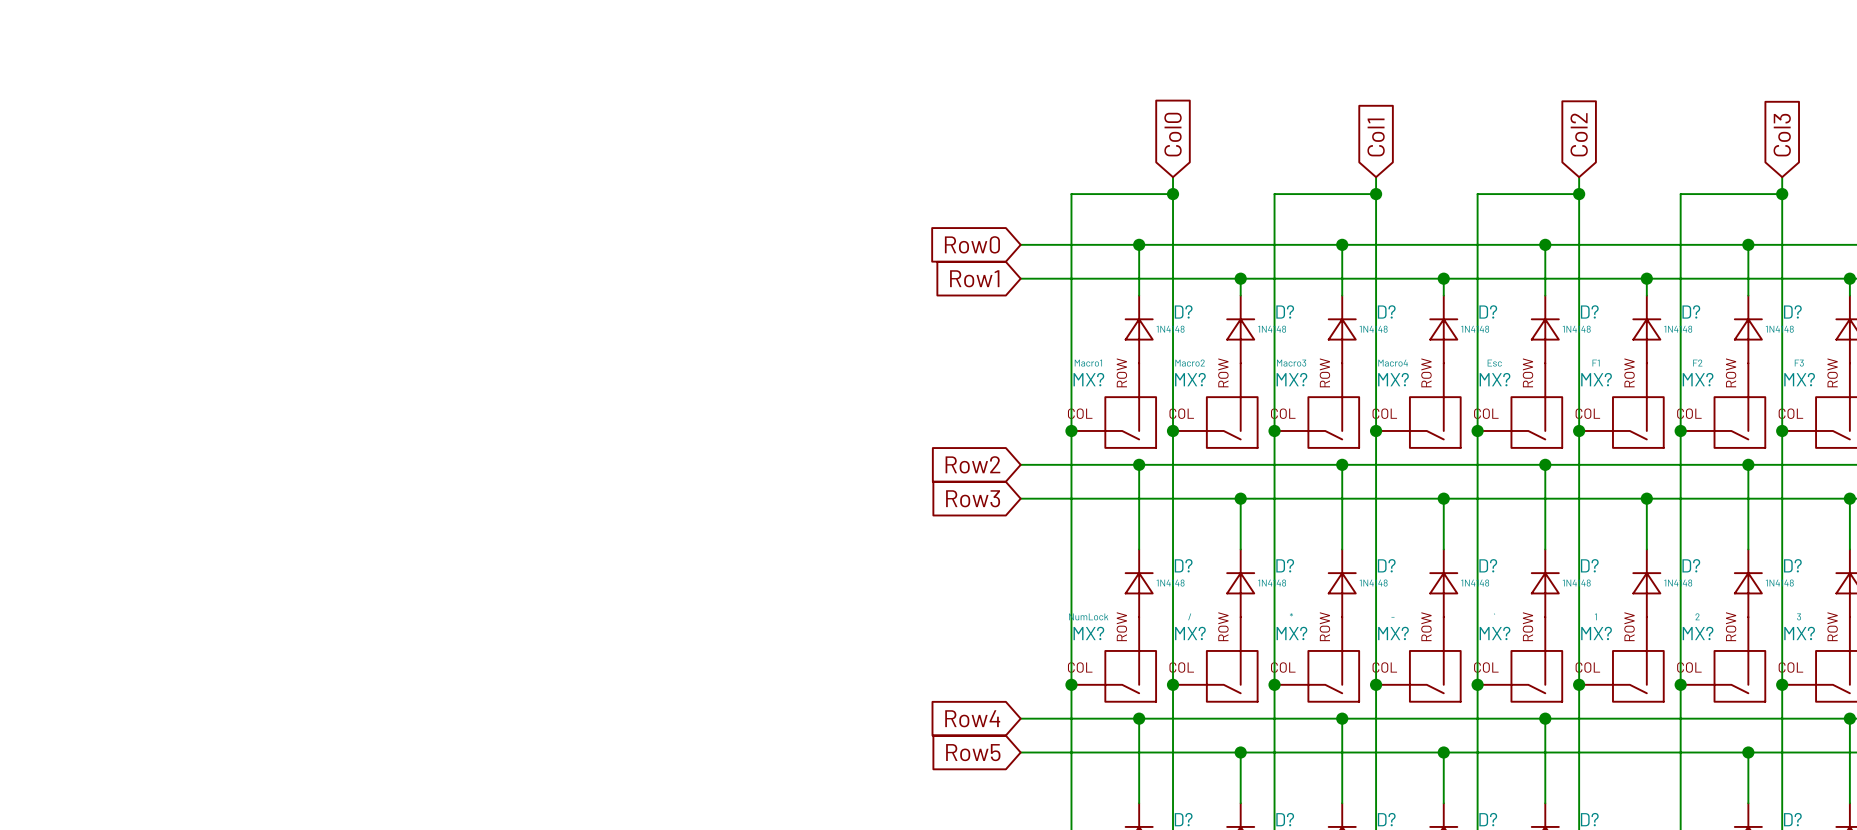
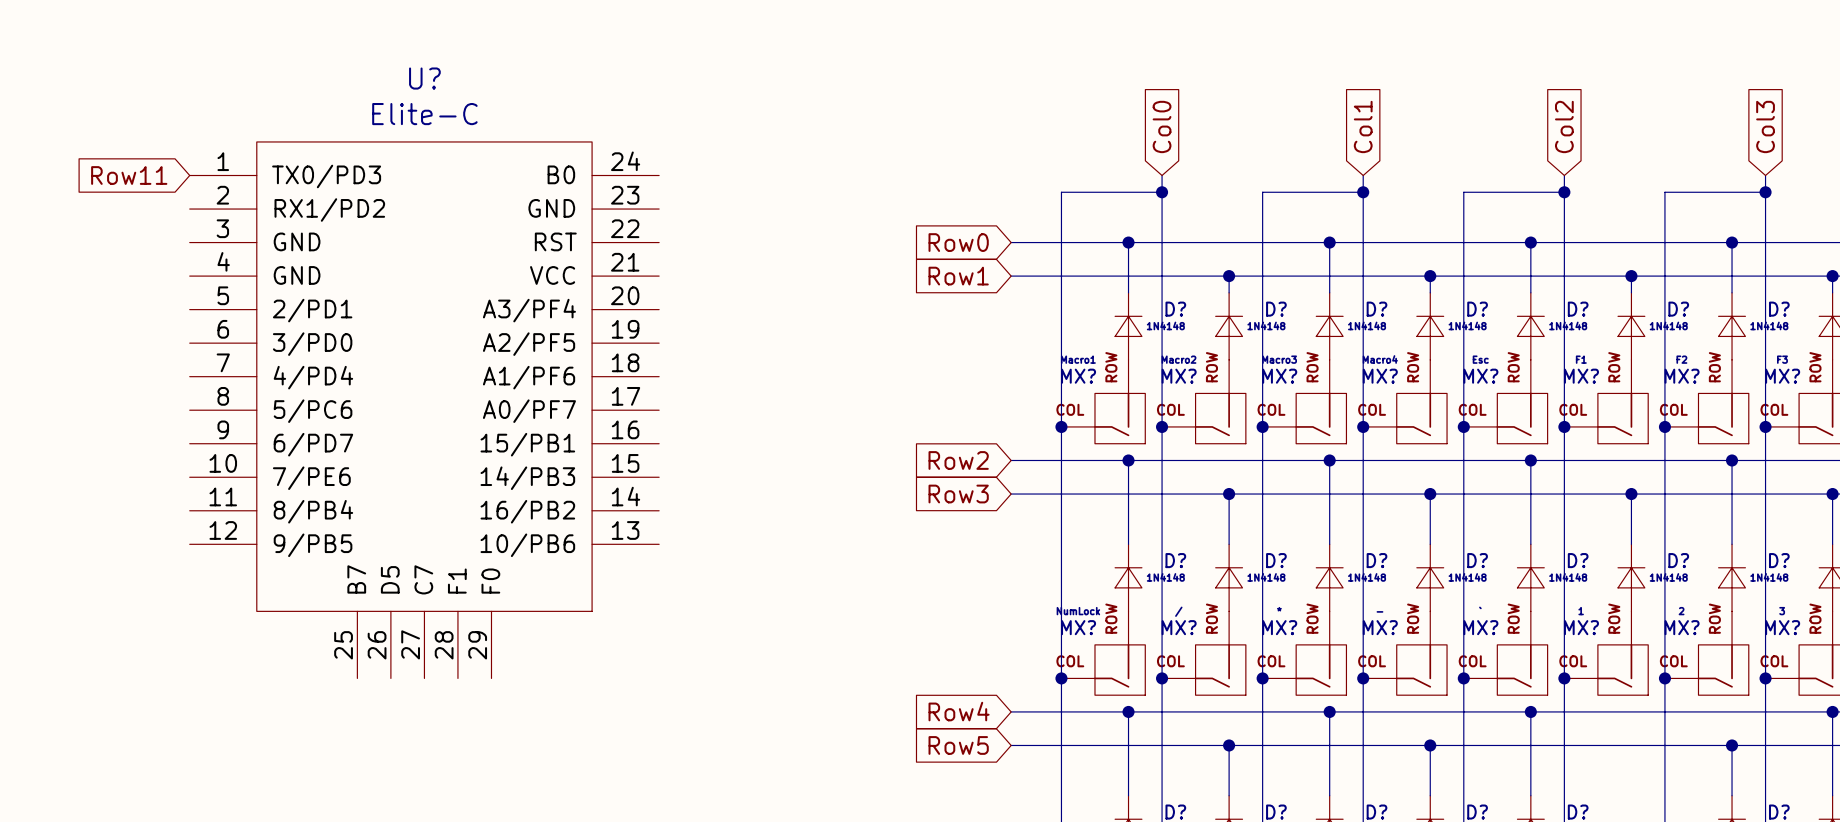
global label: none -> Row11 (129, 175)
U?: none -> Elite-C (424, 410)

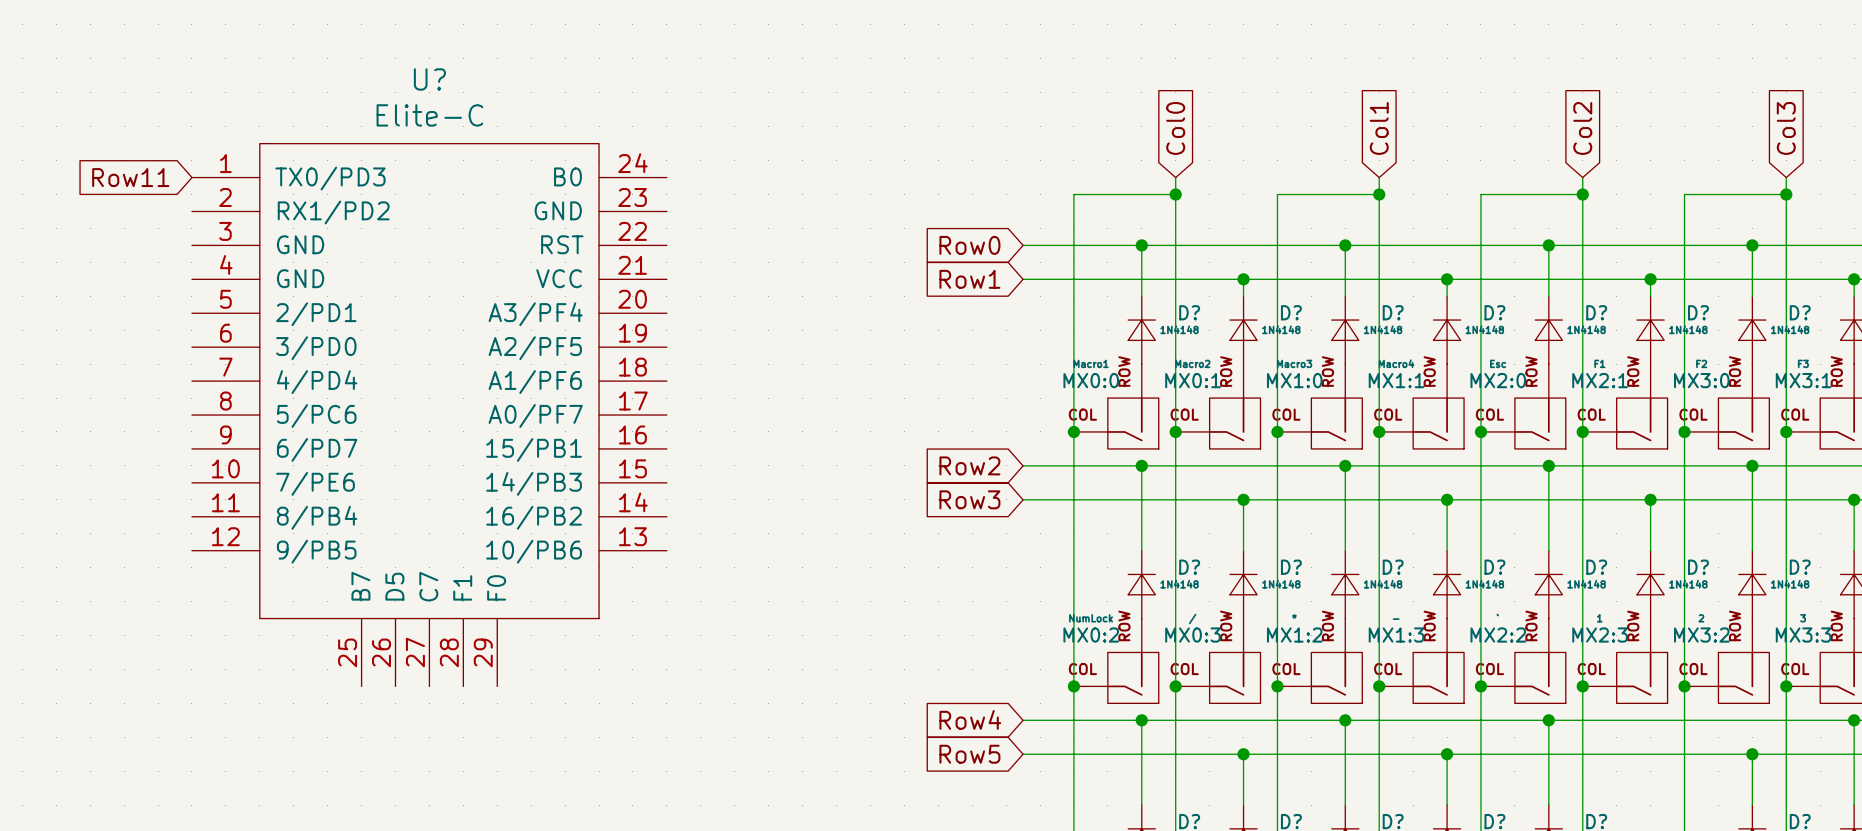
MX? name: MX? (1078, 376) -> MX0:0 (1091, 380)
MX? name: MX? (1179, 376) -> MX0:1 (1192, 380)
MX? name: MX? (1279, 376) -> MX1:0 (1294, 380)
MX? name: MX? (1380, 376) -> MX1:1 (1396, 380)
MX? name: MX? (1480, 376) -> MX2:0 (1498, 380)
MX? name: MX? (1581, 376) -> MX2:1 (1600, 380)
MX? name: MX? (1682, 376) -> MX3:0 (1701, 380)
MX? name: MX? (1782, 376) -> MX3:1 (1803, 380)
MX? name: MX? (1078, 627) -> MX0:2 (1091, 635)
MX? name: MX? (1179, 627) -> MX0:3 (1192, 635)
MX? name: MX? (1279, 627) -> MX1:2 (1294, 635)
MX? name: MX? (1380, 627) -> MX1:3 (1396, 635)
MX? name: MX? (1480, 627) -> MX2:2 (1498, 635)
MX? name: MX? (1581, 627) -> MX2:3 (1600, 635)
MX? name: MX? (1682, 627) -> MX3:2 (1701, 635)
MX? name: MX? (1782, 627) -> MX3:3 (1803, 635)

